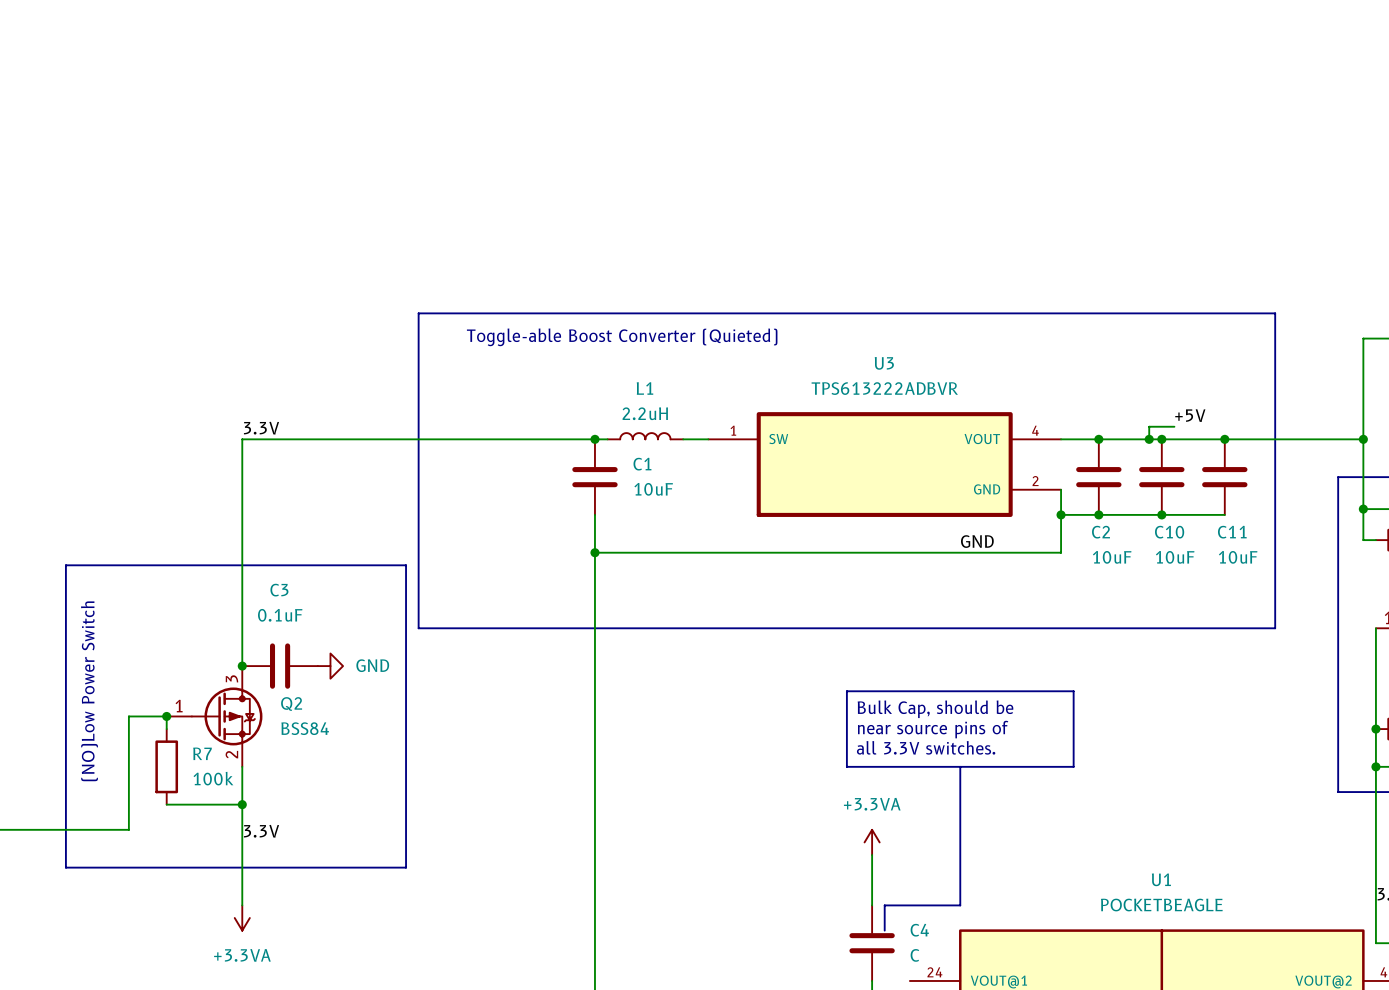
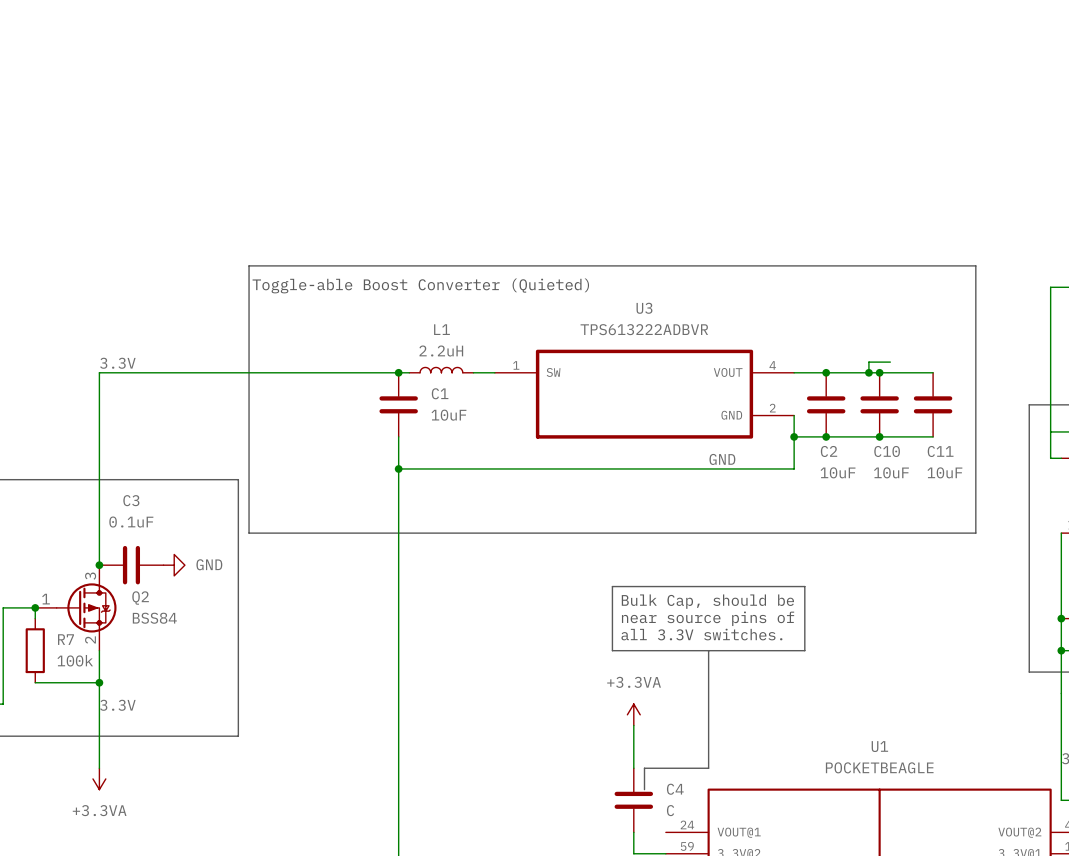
label: +5V (1190, 415) -> none
wire: (1224, 439) (1363, 439) -> none
junction: (1224, 439) -> none
junction: (1363, 439) -> none
junction: (1363, 509) -> none

